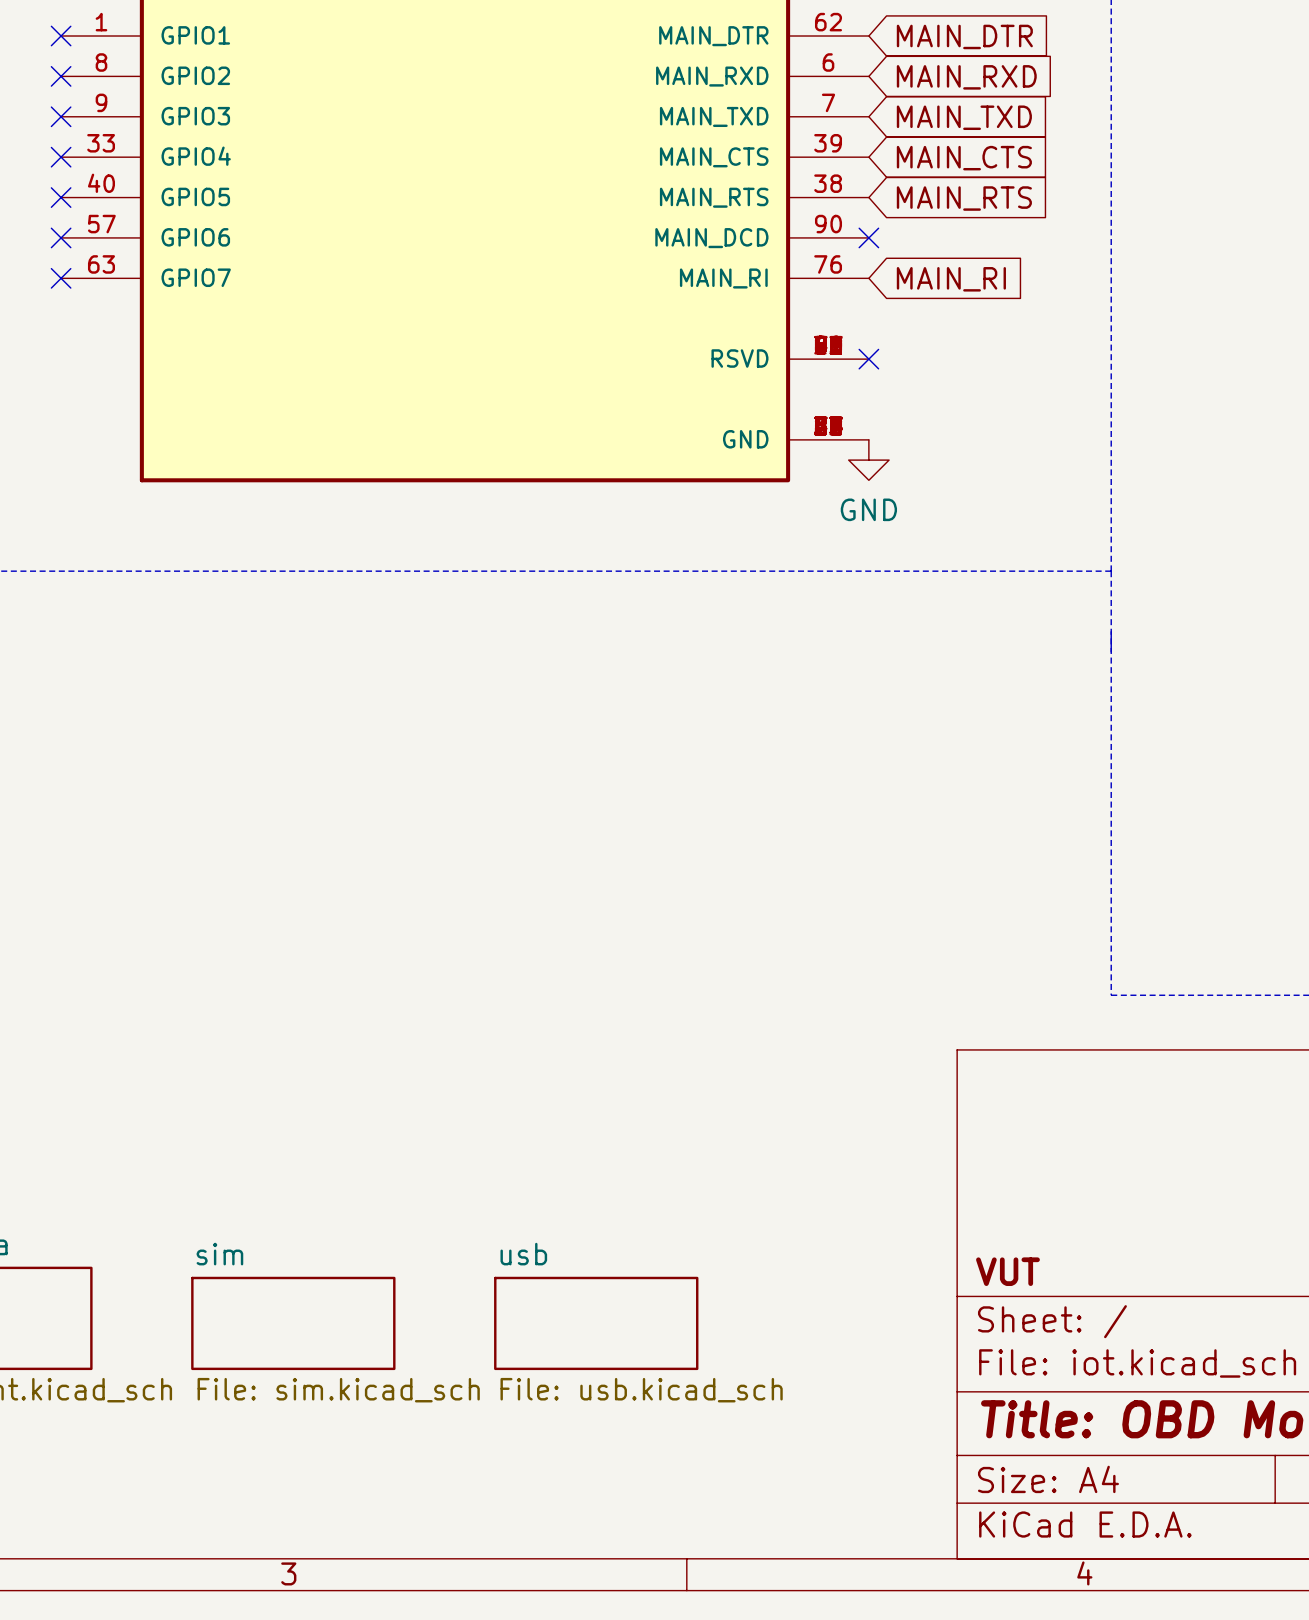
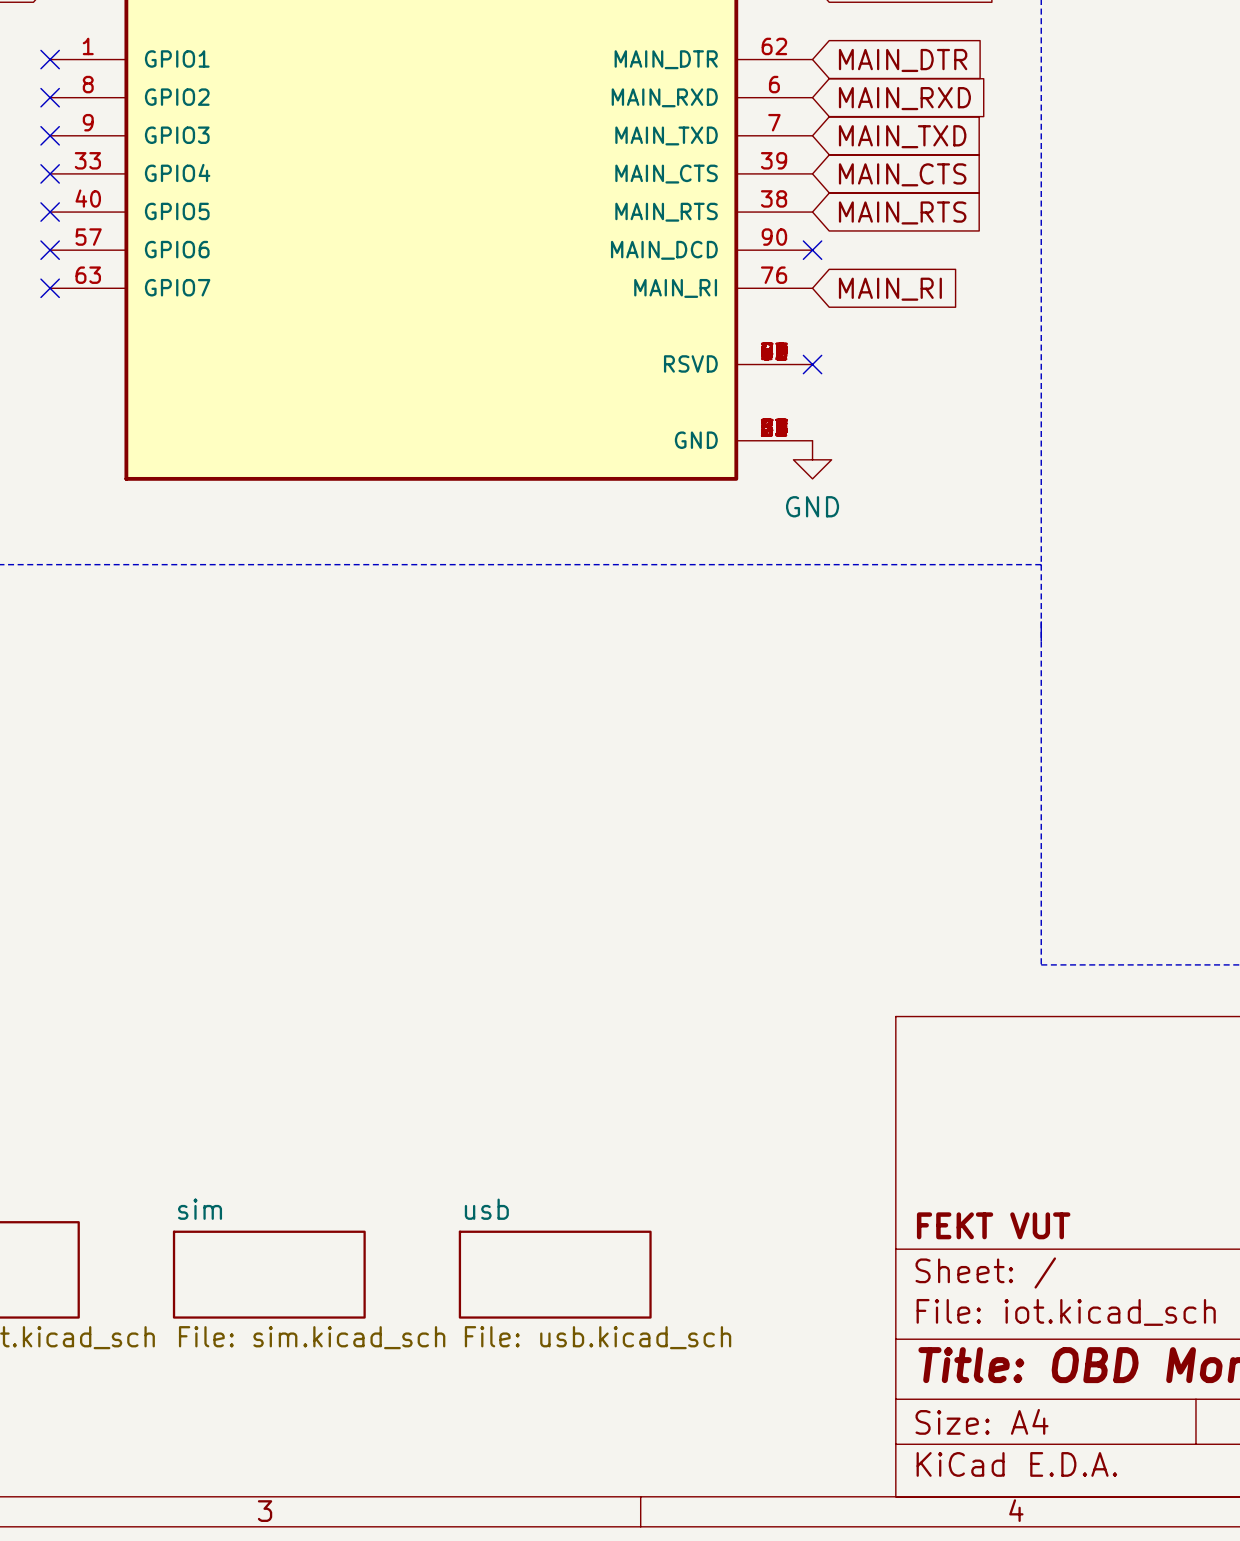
title block: VUT (1007, 1271) -> FEKT VUT (993, 1225)

